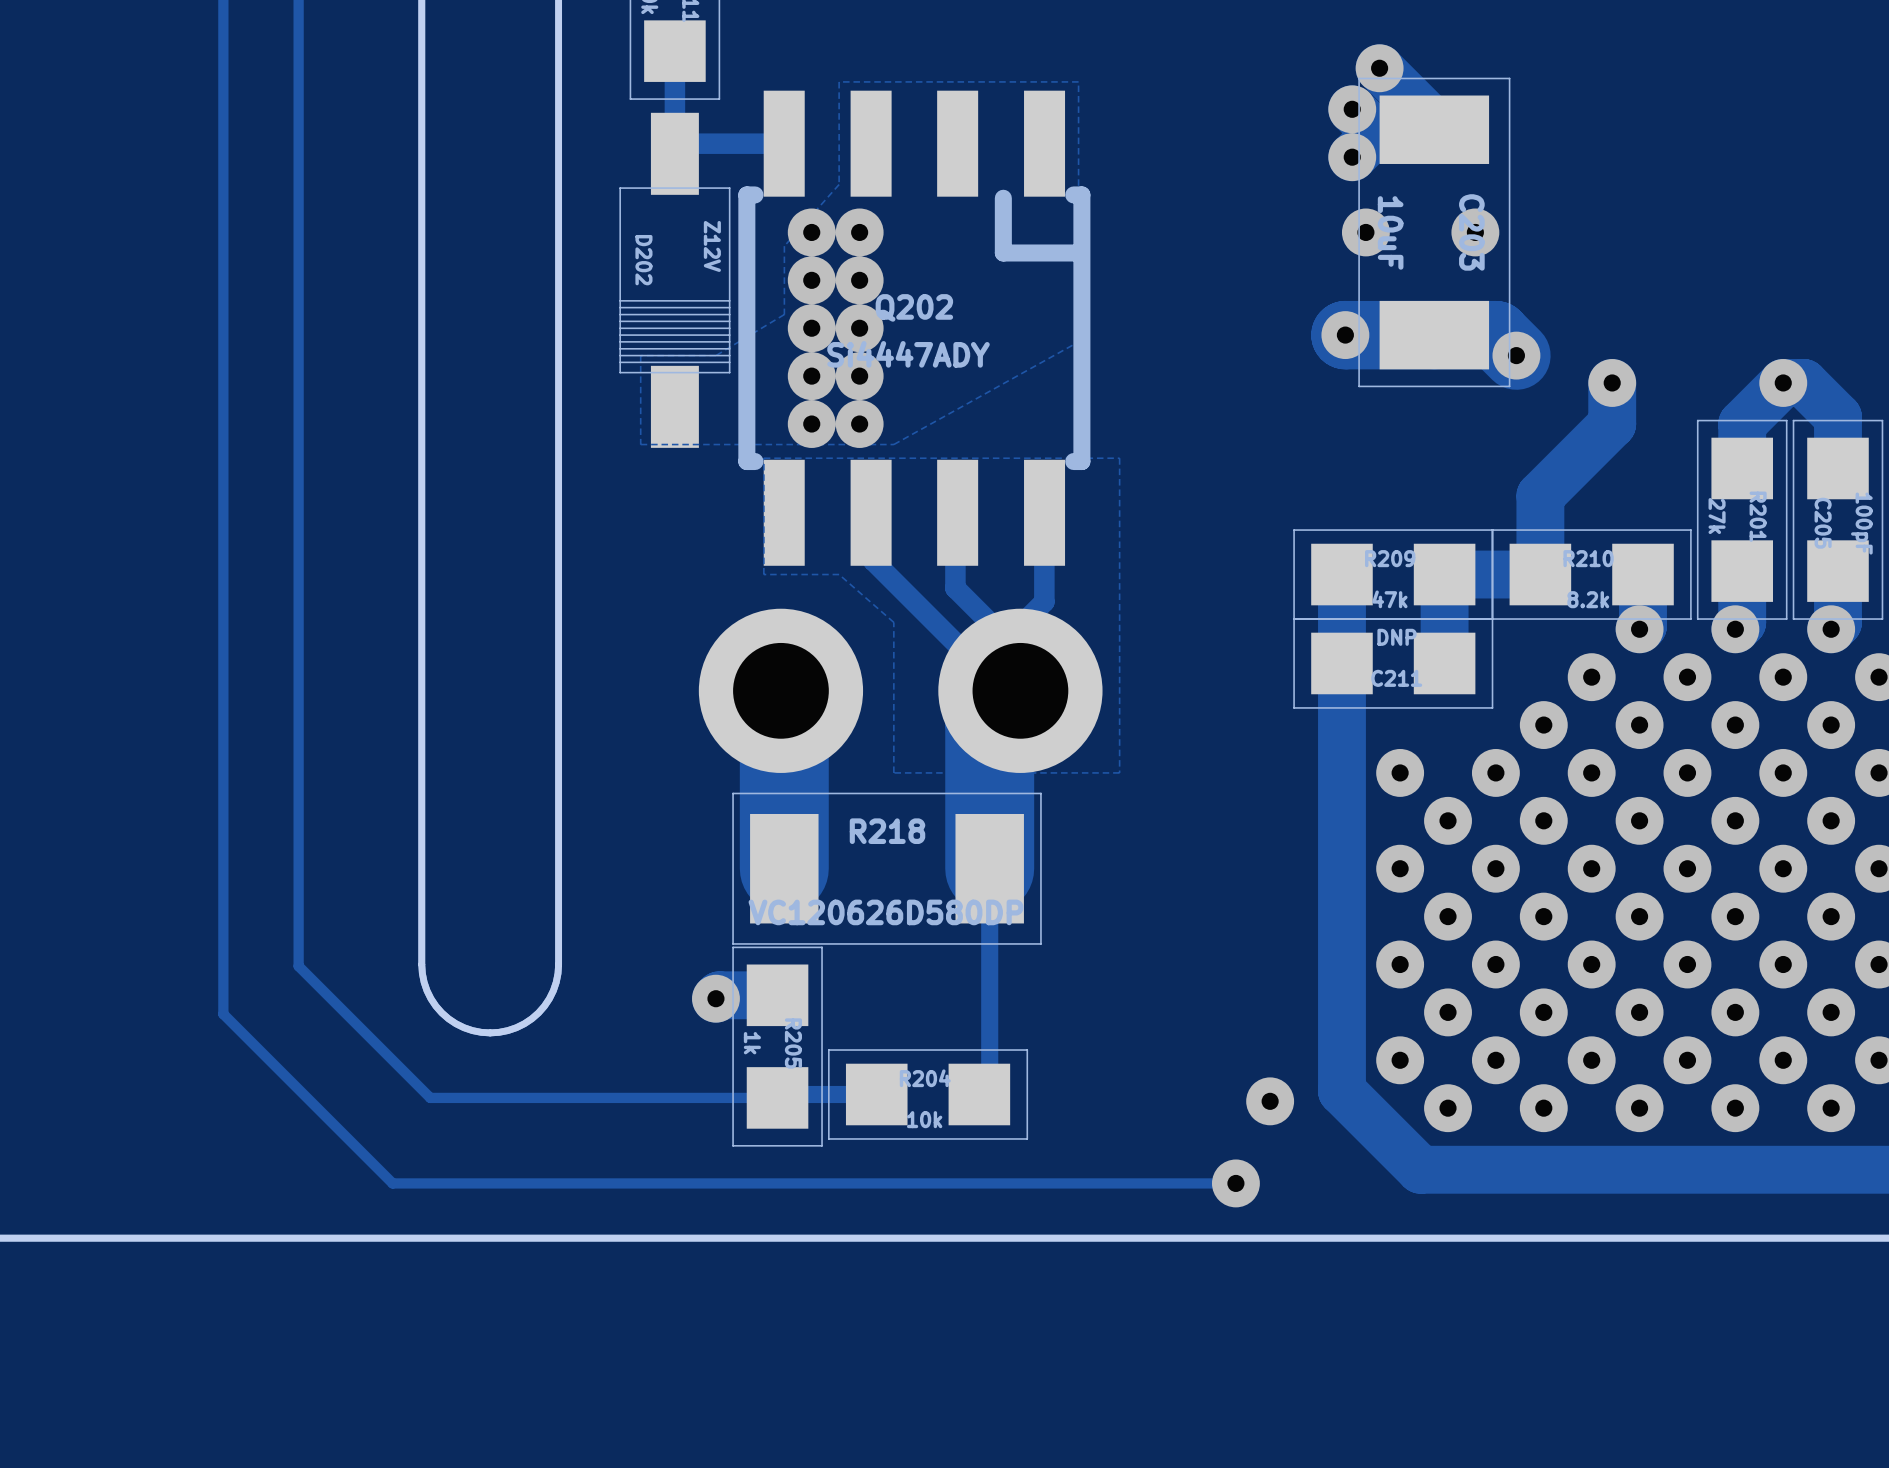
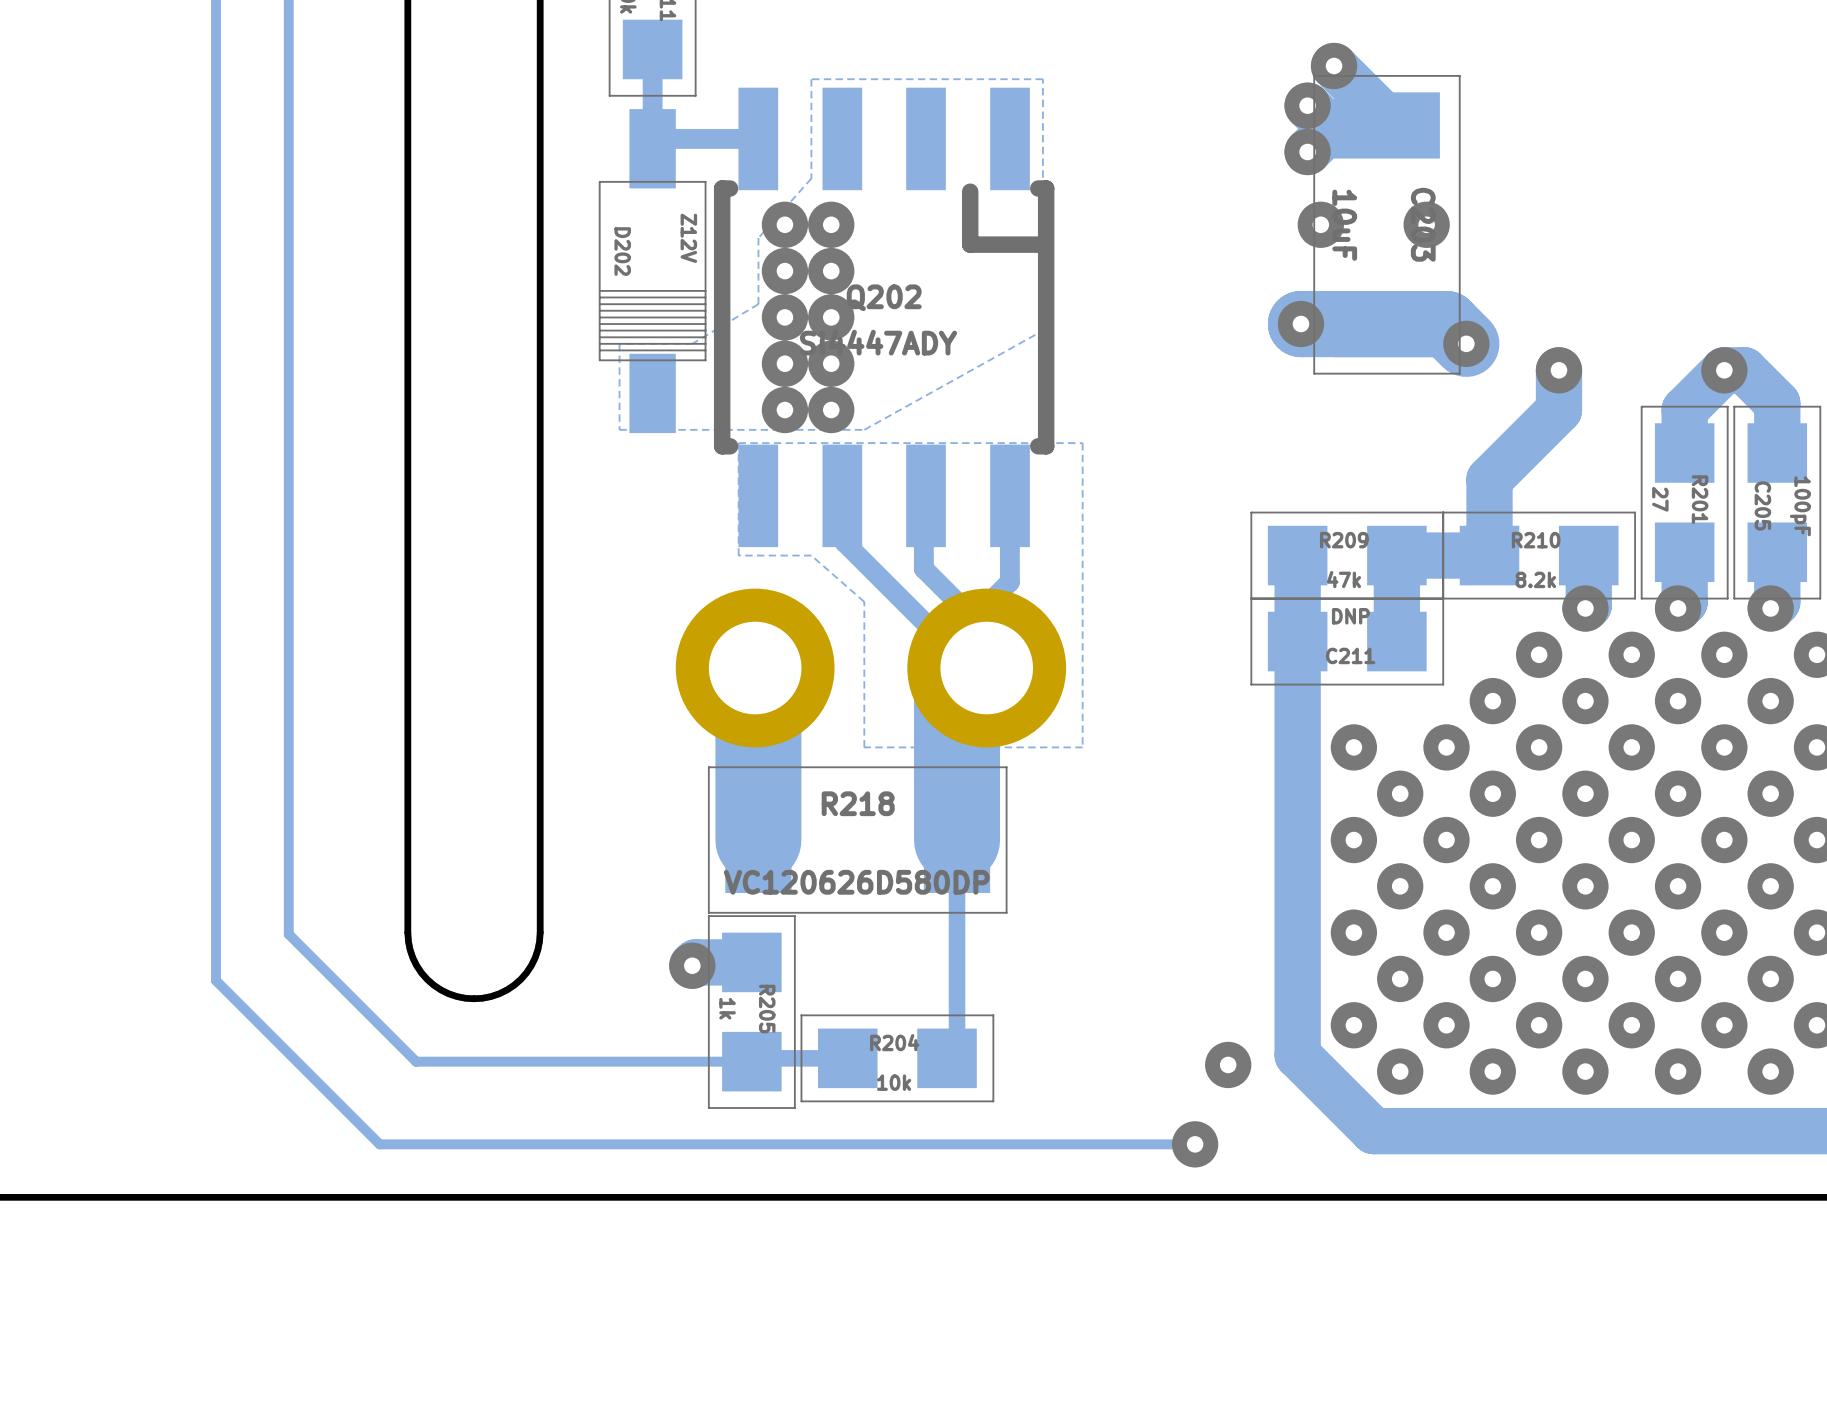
R201 value: 27k (1717, 516) -> 27 (1660, 499)

